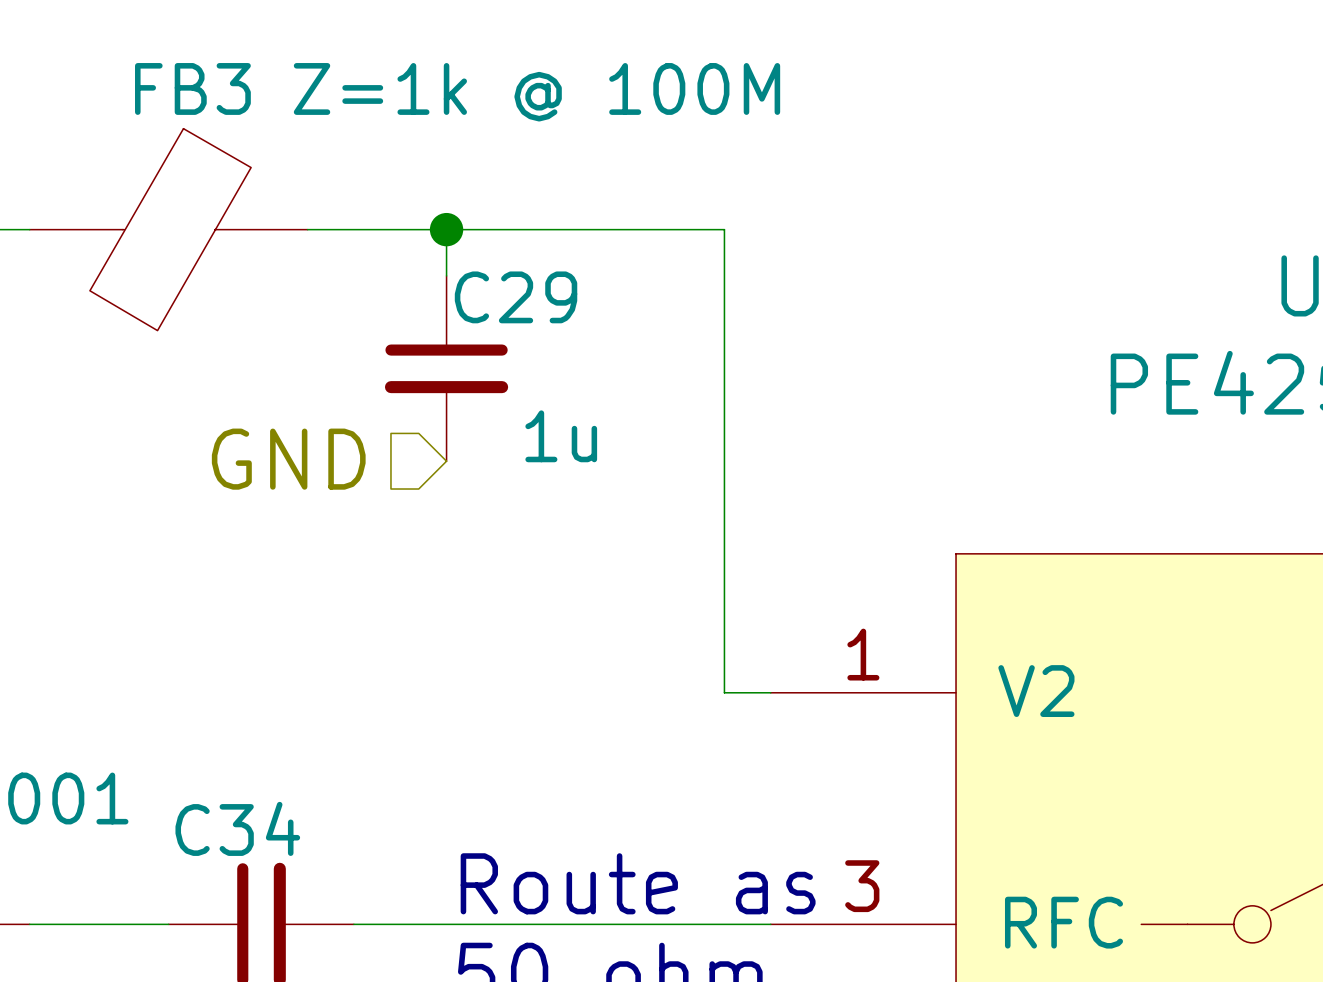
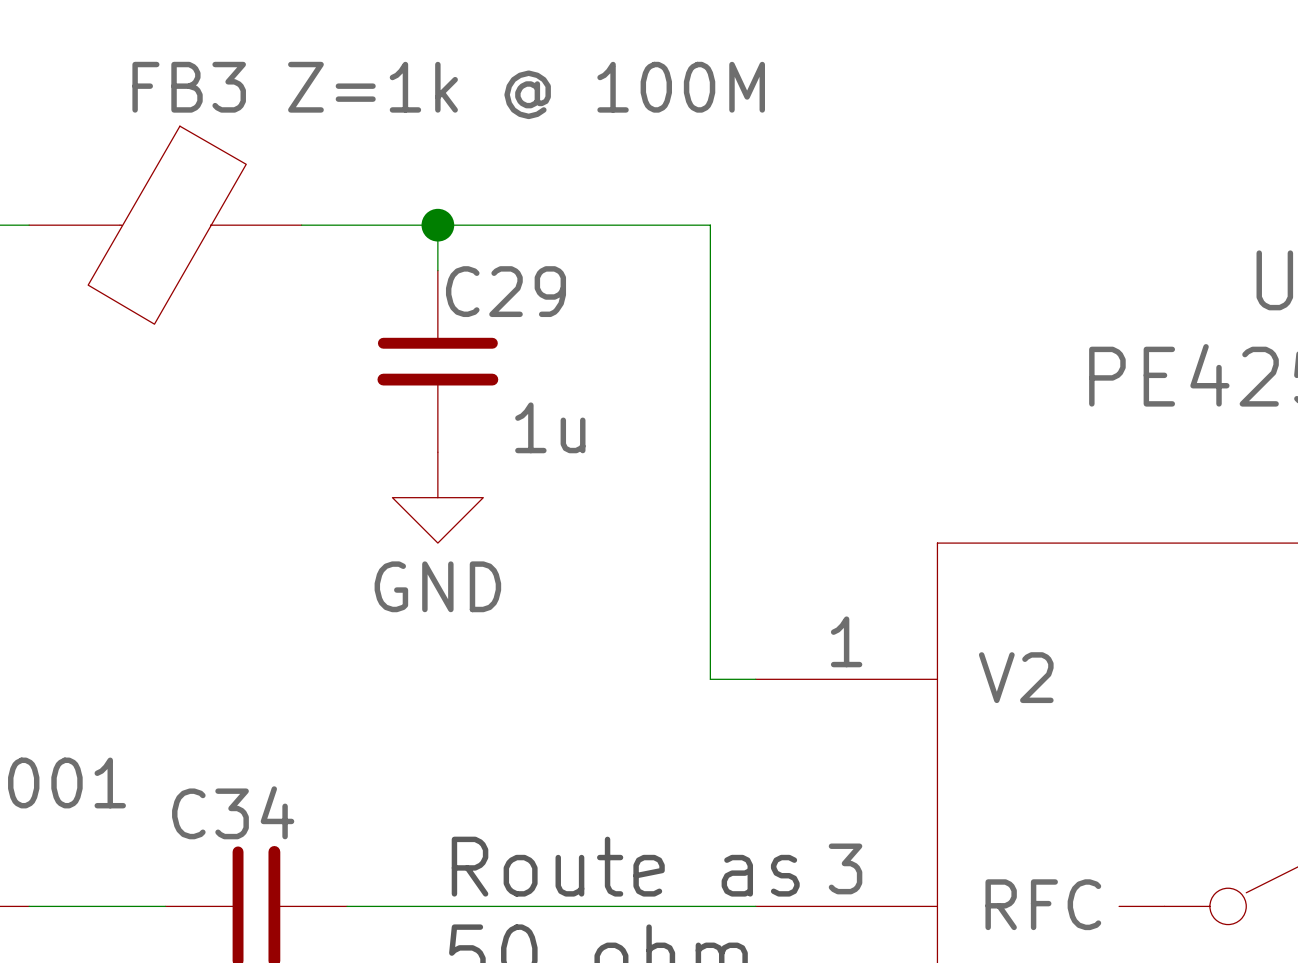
hierarchical label: GND (288, 459) -> none
power symbol: none -> GND (437, 497)

